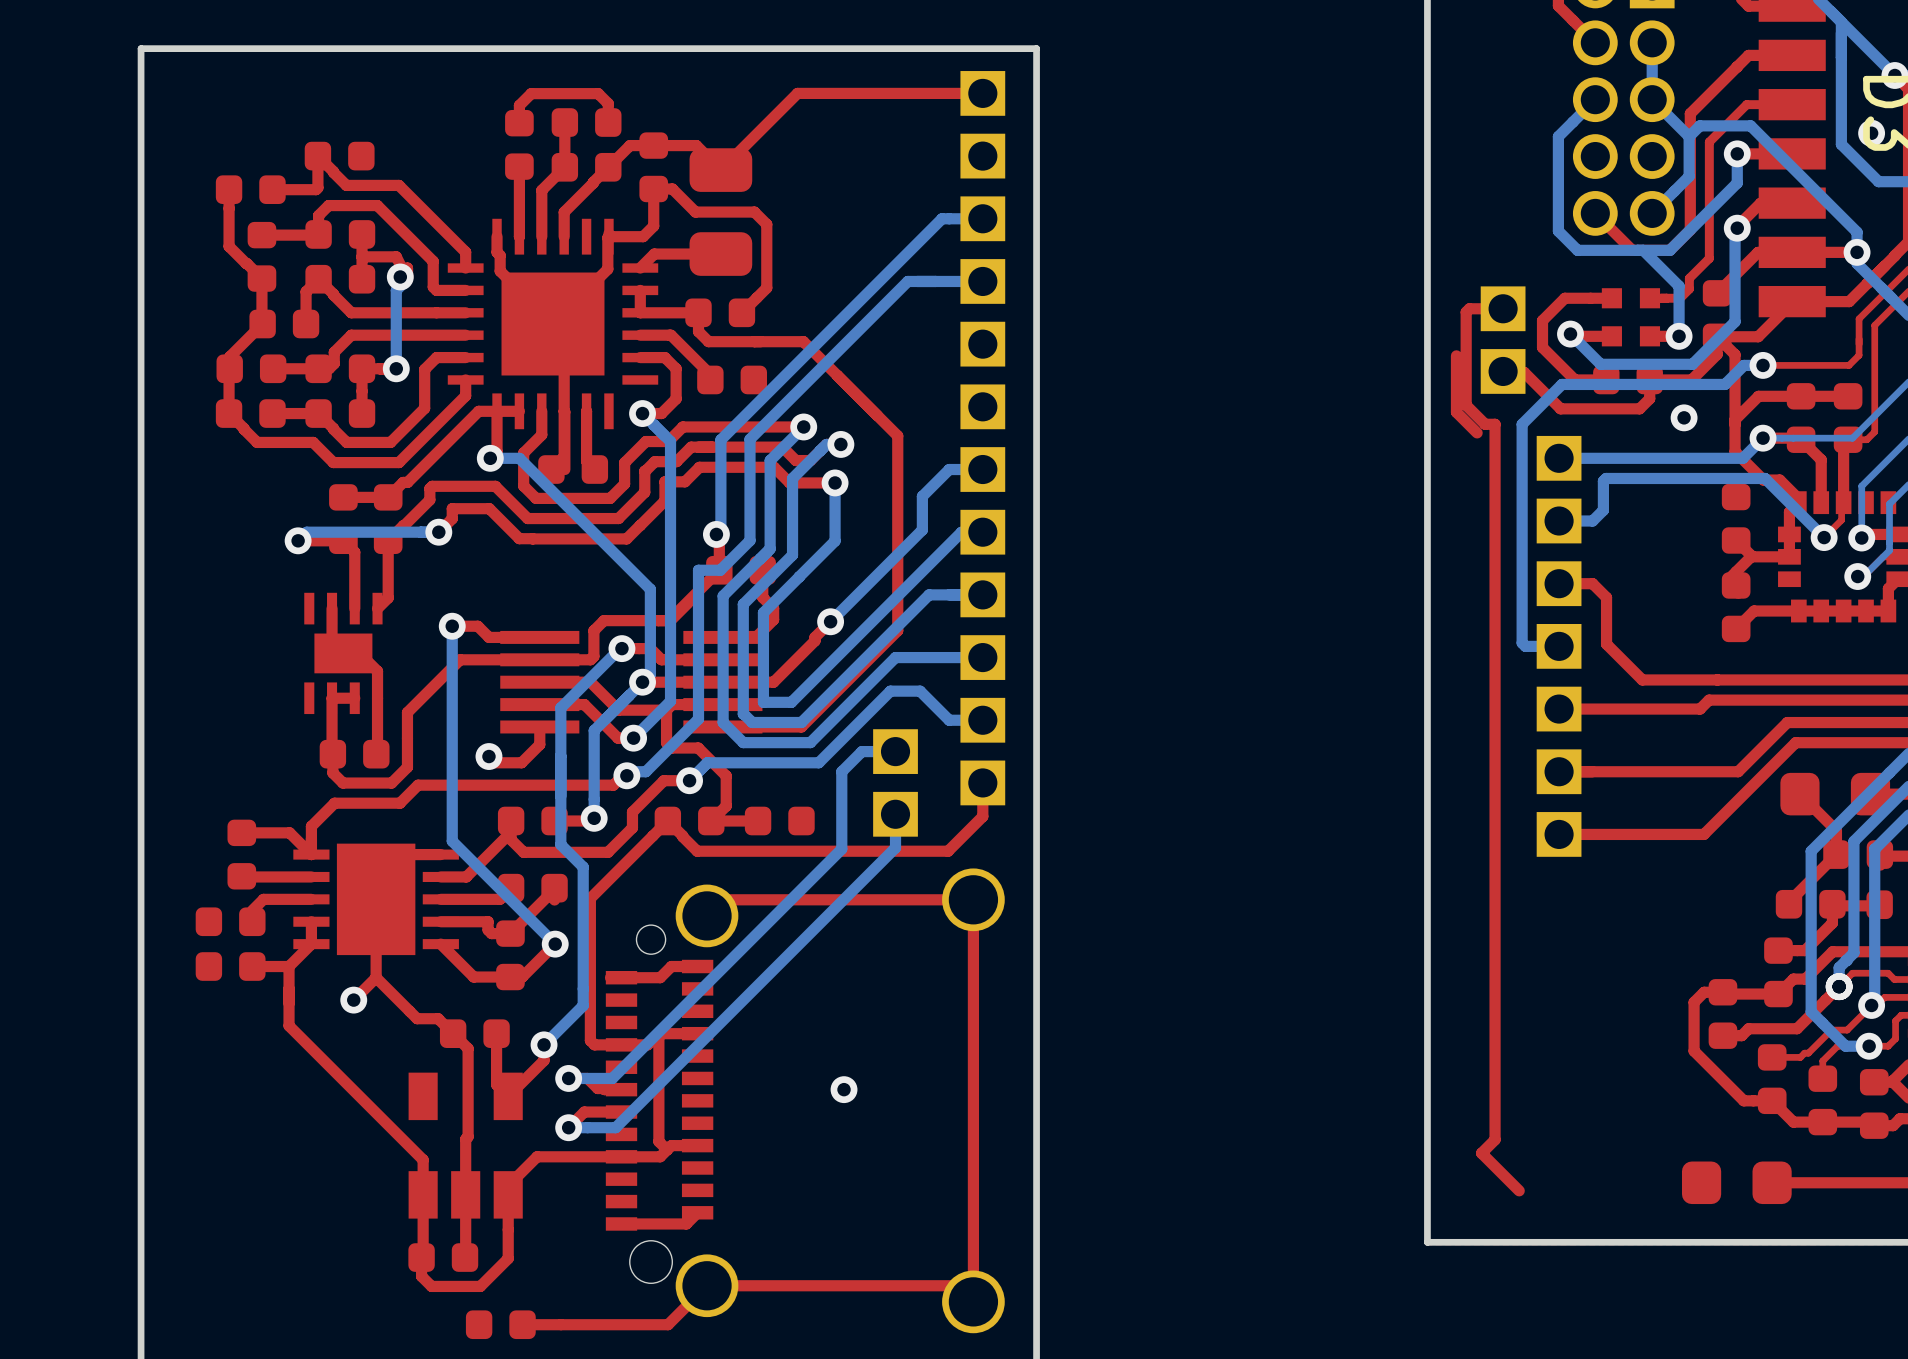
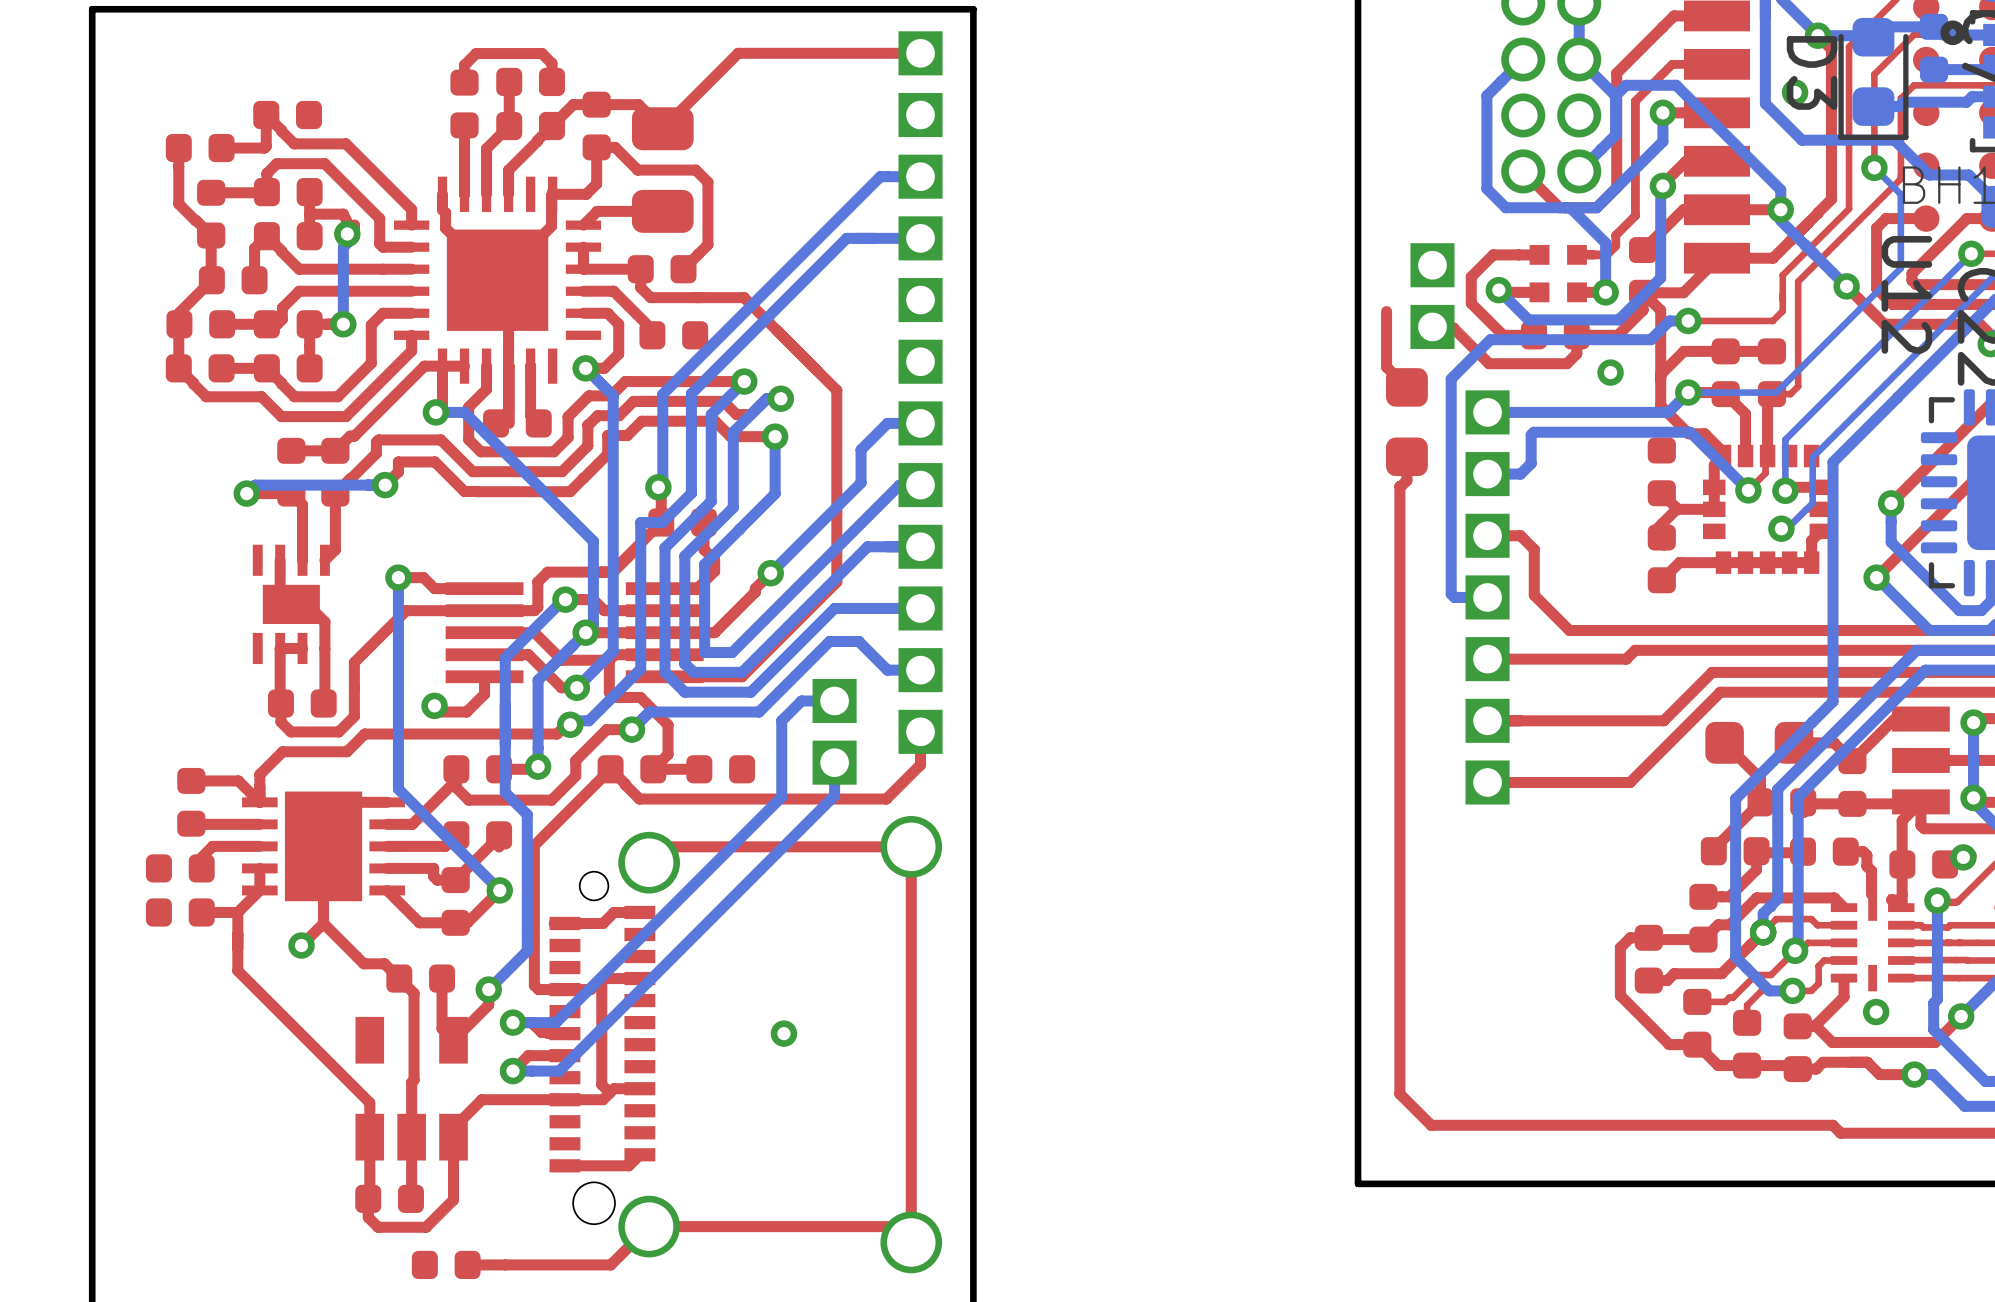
top track: (1503, 308) (1469, 308) (1466, 312) (1466, 405) (1485, 424) (1495, 424) (1495, 1139) (1481, 1153) (1519, 1190) -> none
top track: none -> (1406, 456) (1406, 480) (1399, 486) (1399, 1093) (1431, 1125) (1697, 1125)
part rotation: 0° (1736, 1182) -> 90° clockwise (1406, 422)
part position: (1736, 1182) -> (1406, 422)

